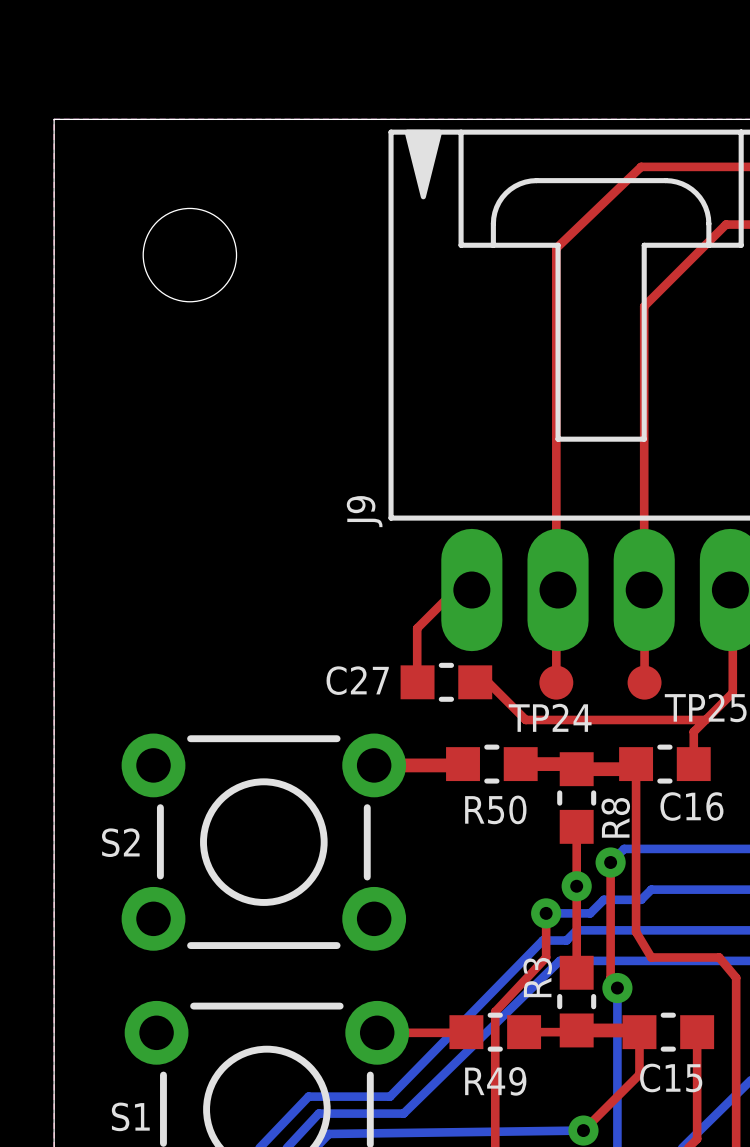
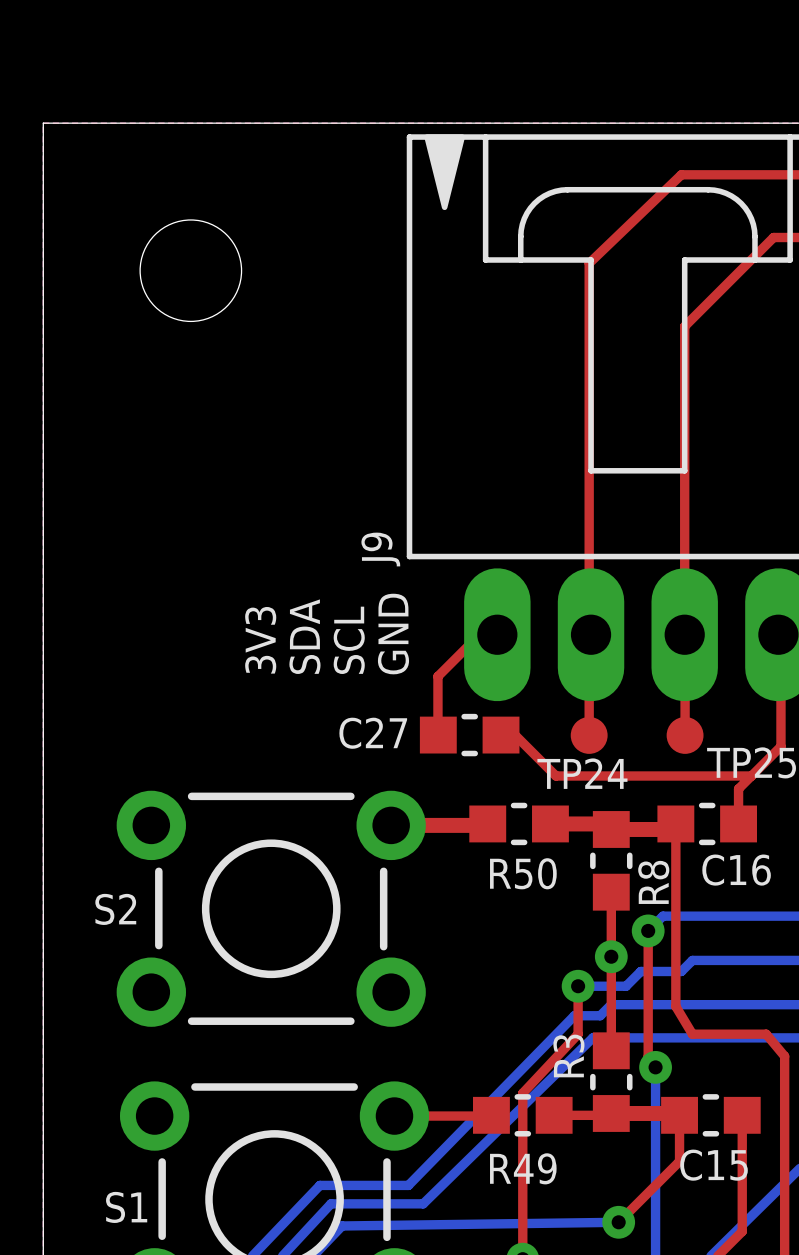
text: none -> GND (393, 634)
text: none -> SDA (304, 636)
text: none -> 3V3 (260, 640)
text: none -> SCL (349, 640)

